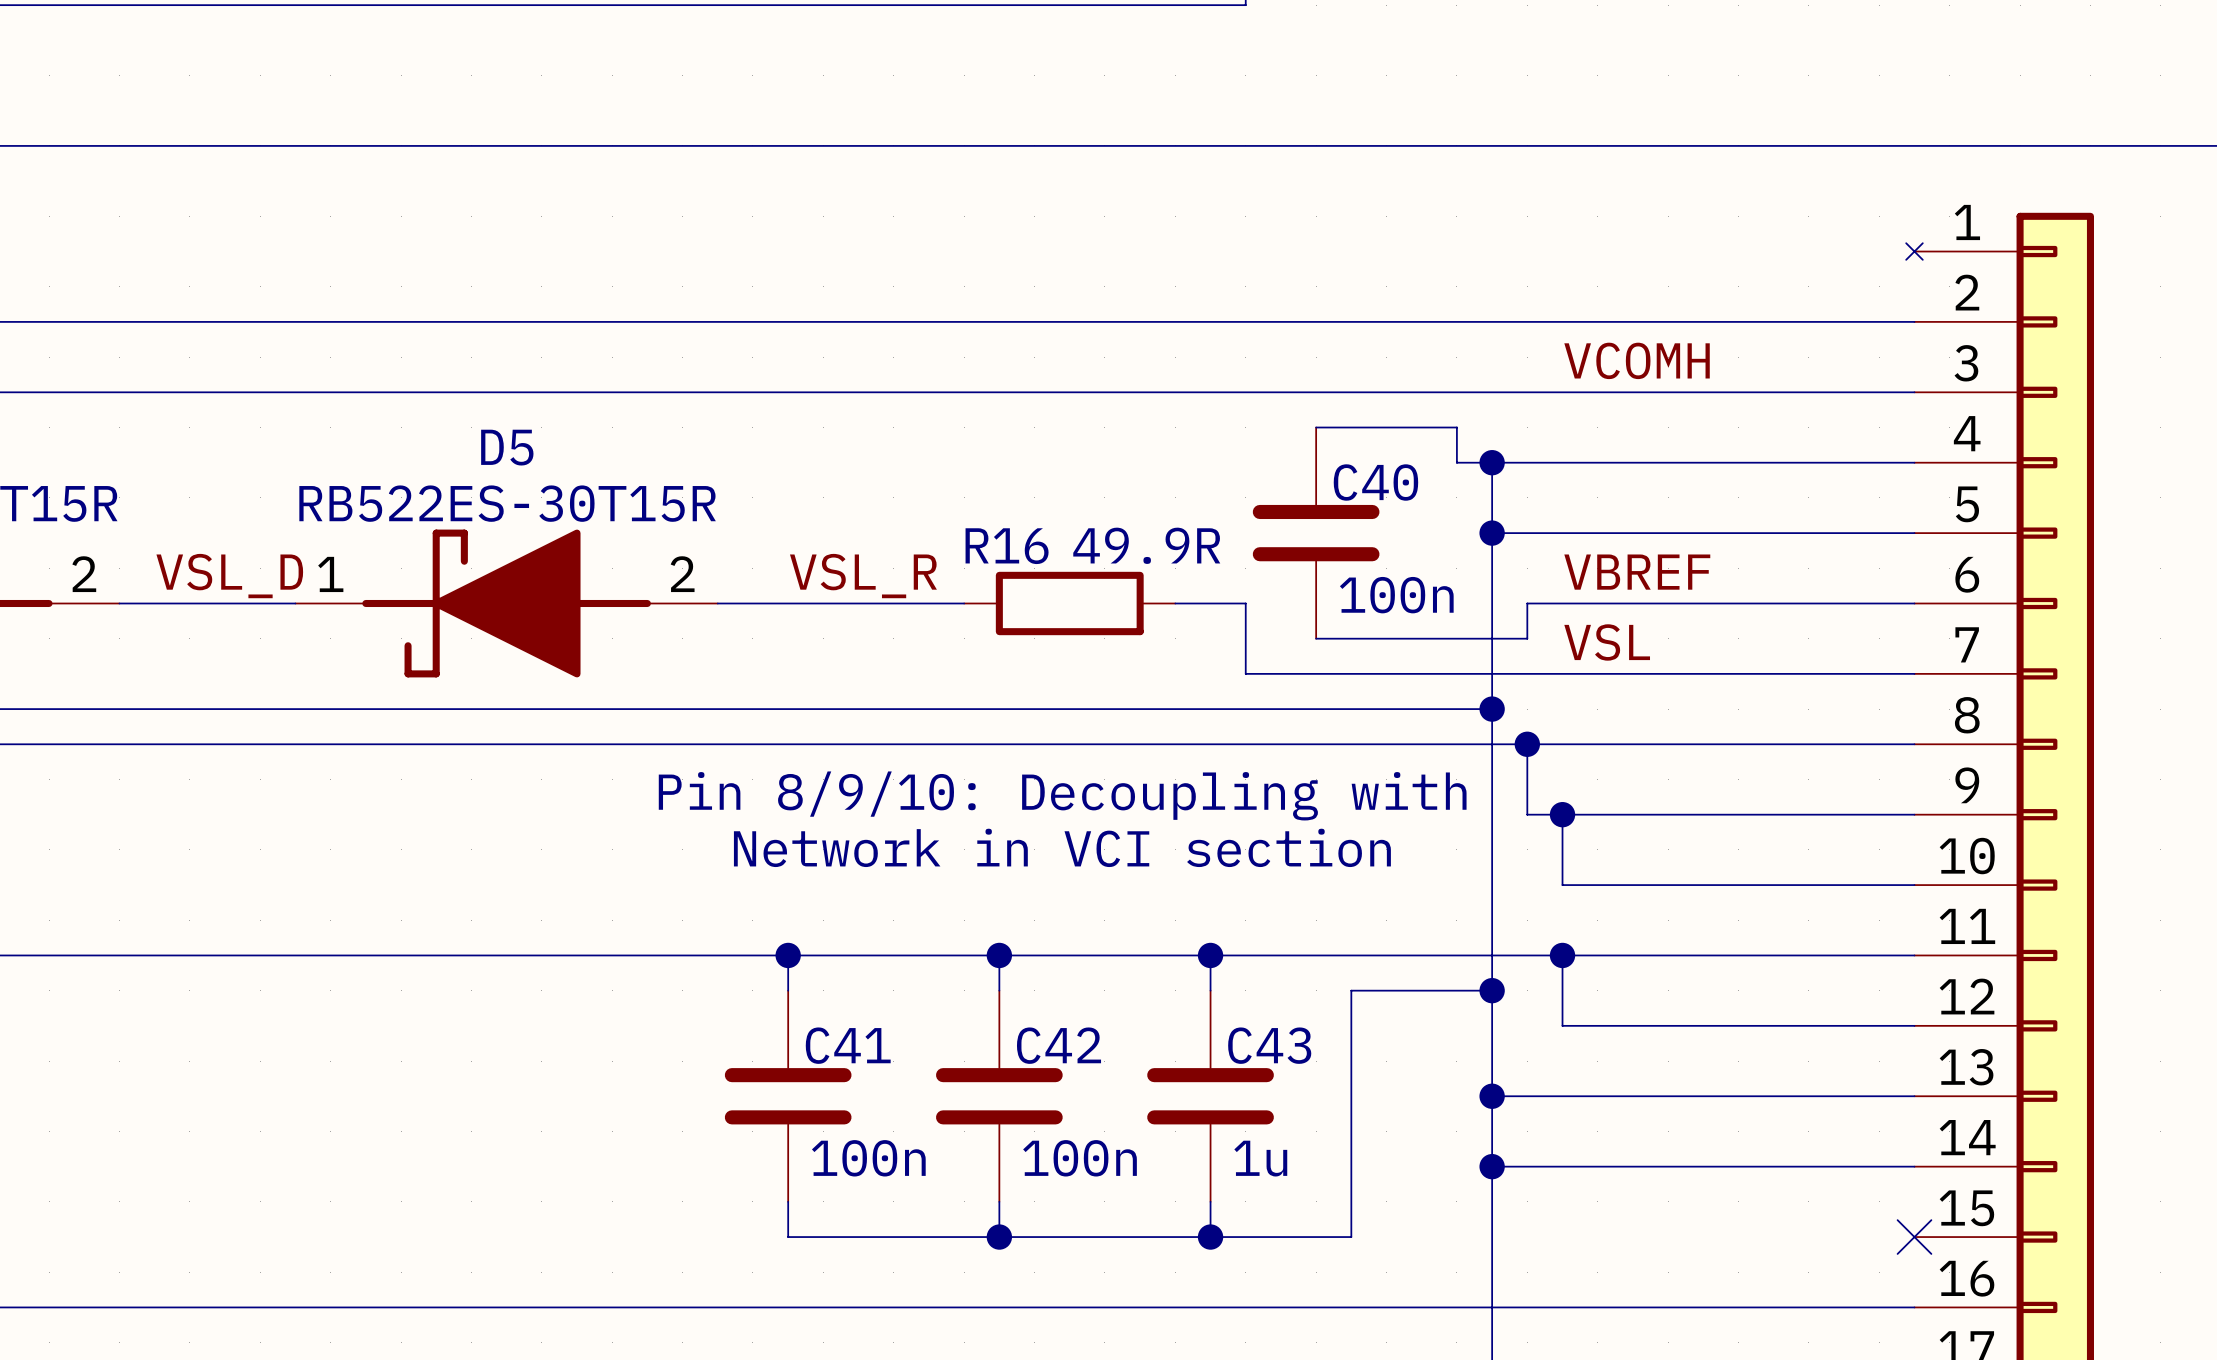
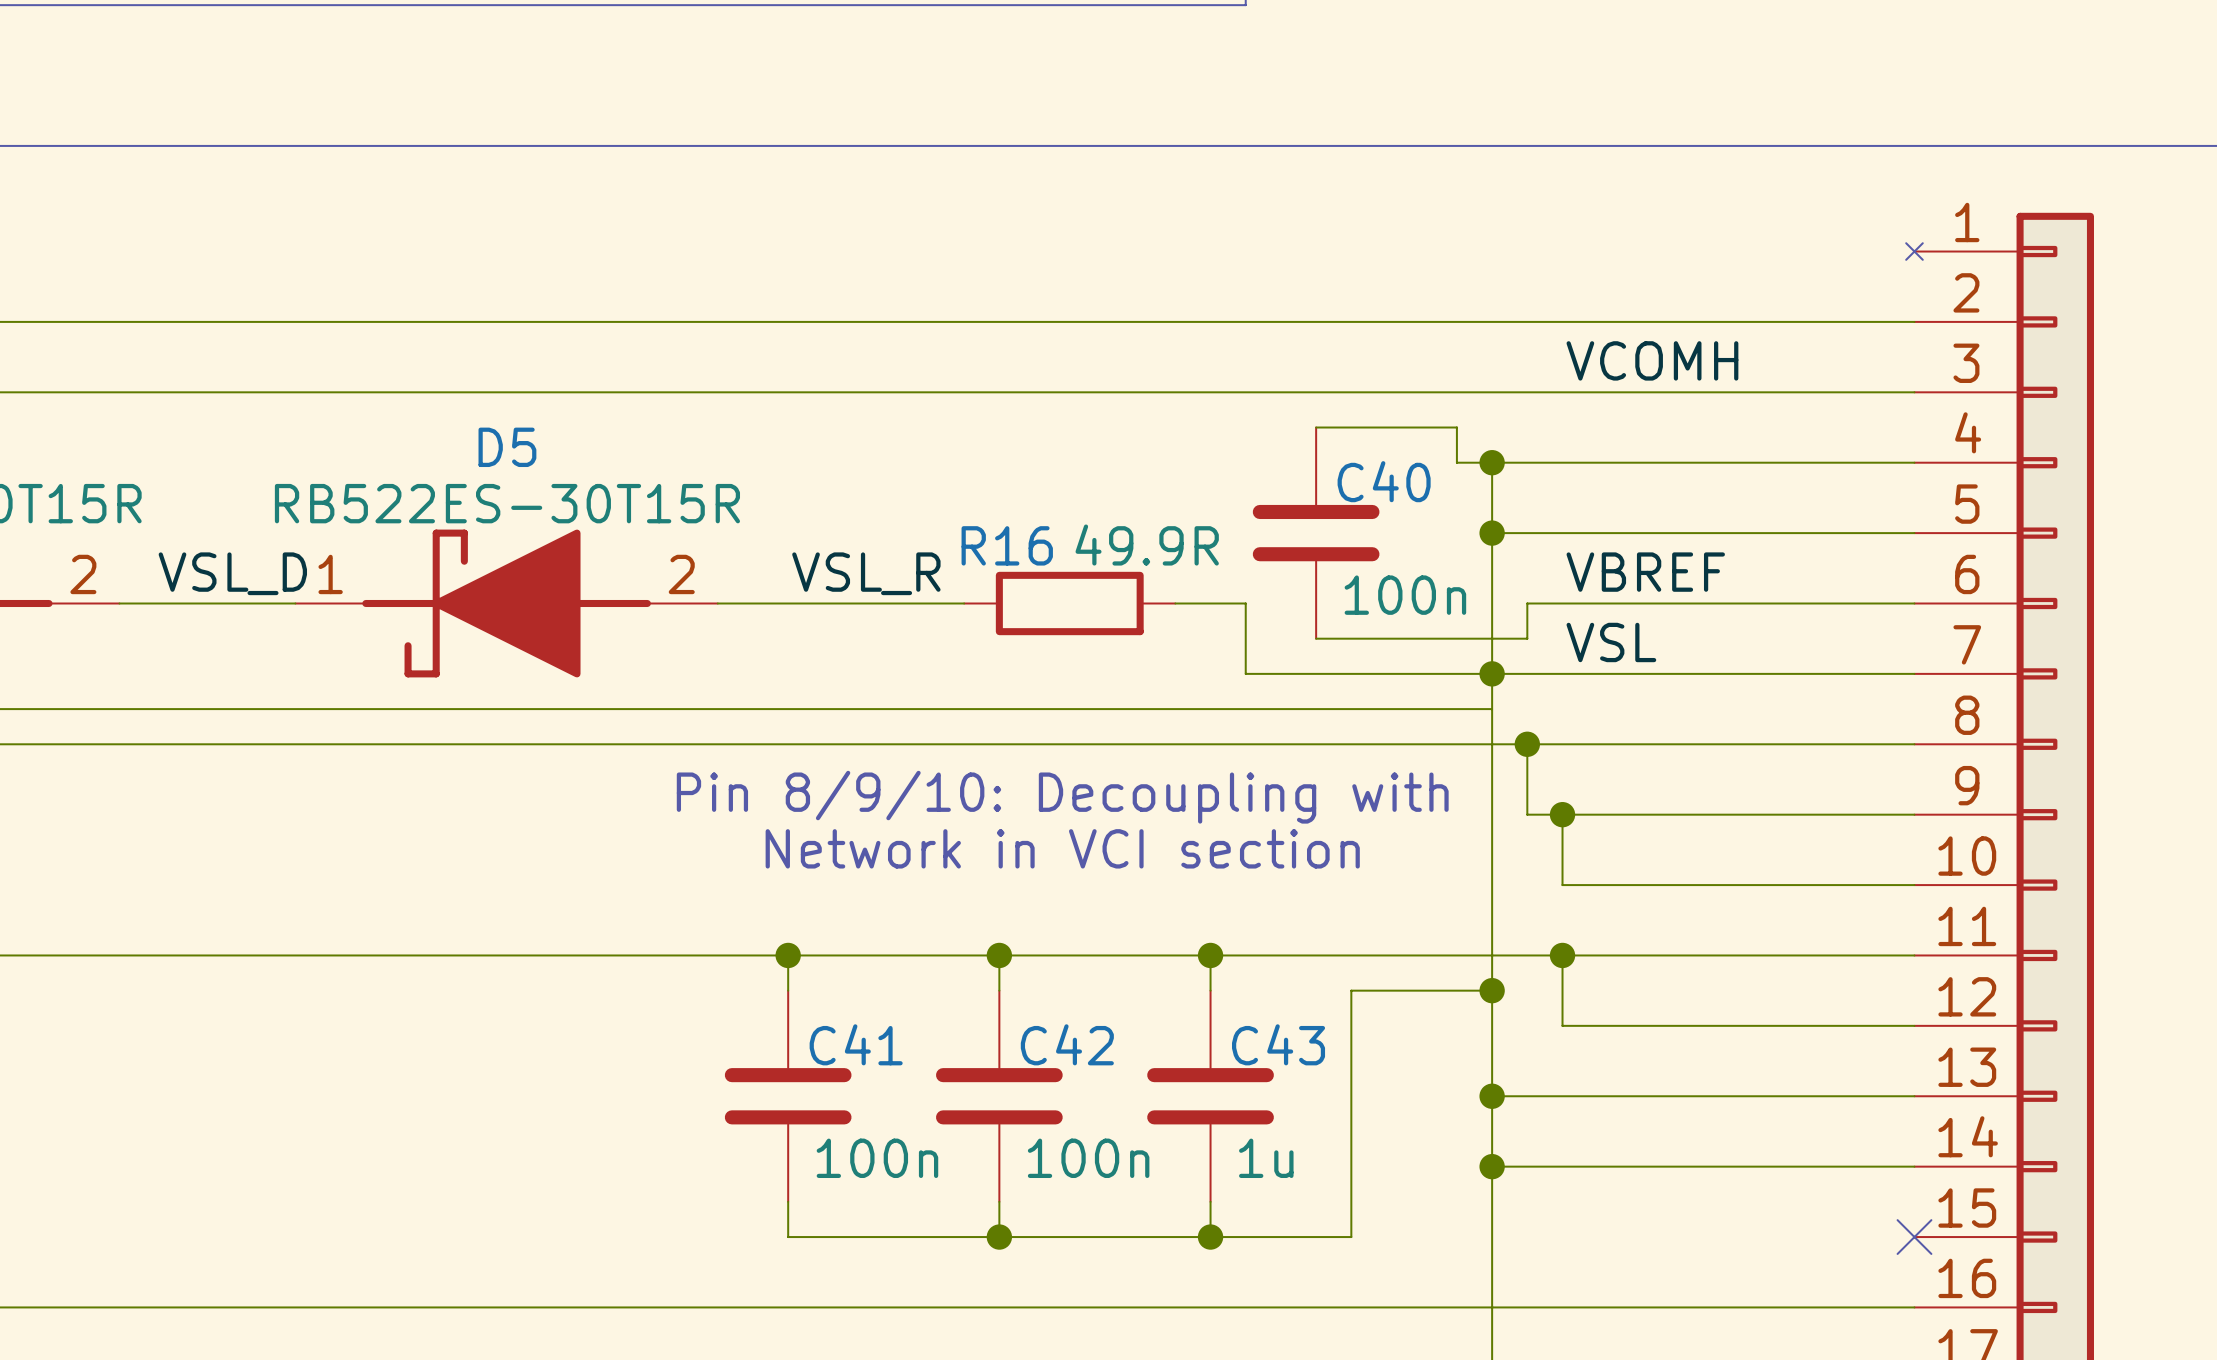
junction position: (1492, 709) -> (1492, 673)

